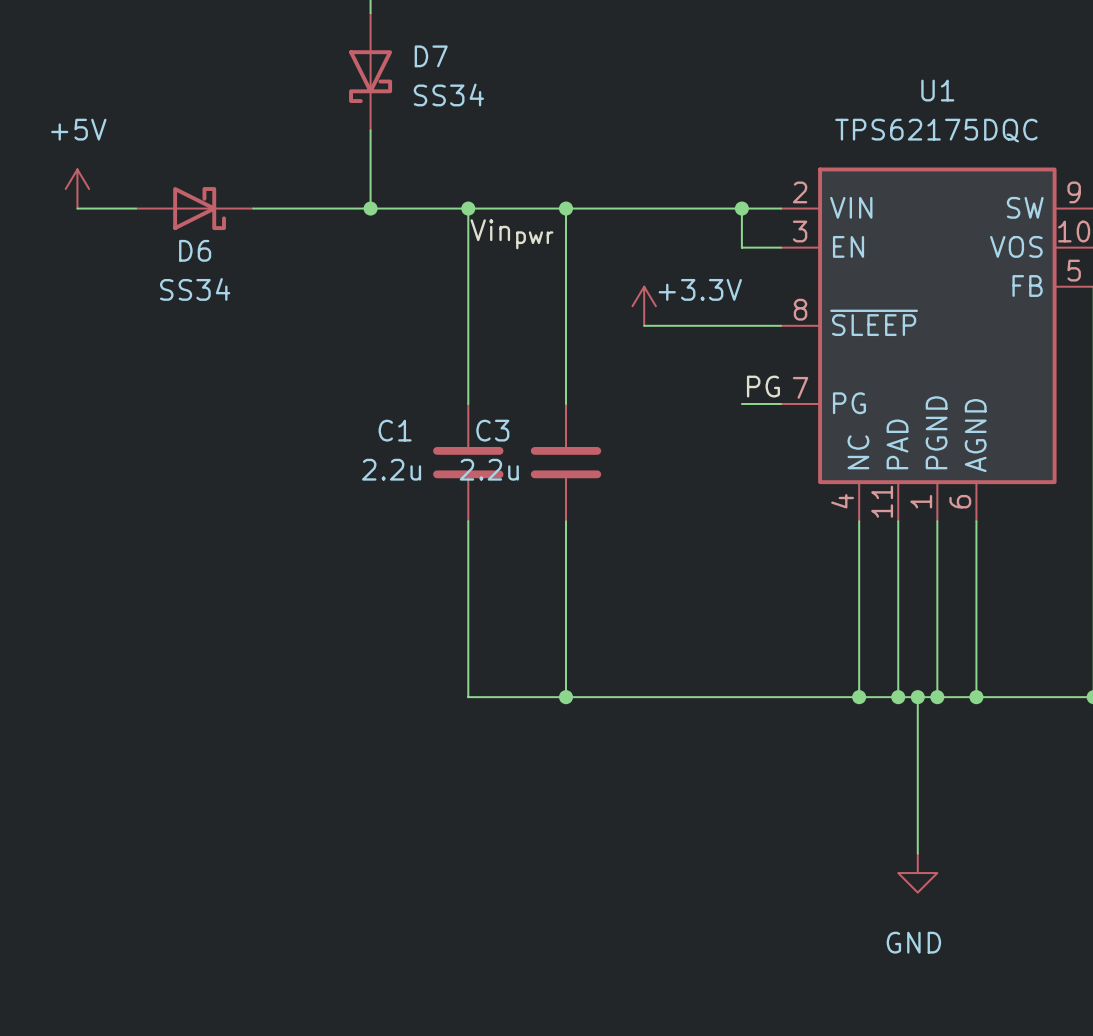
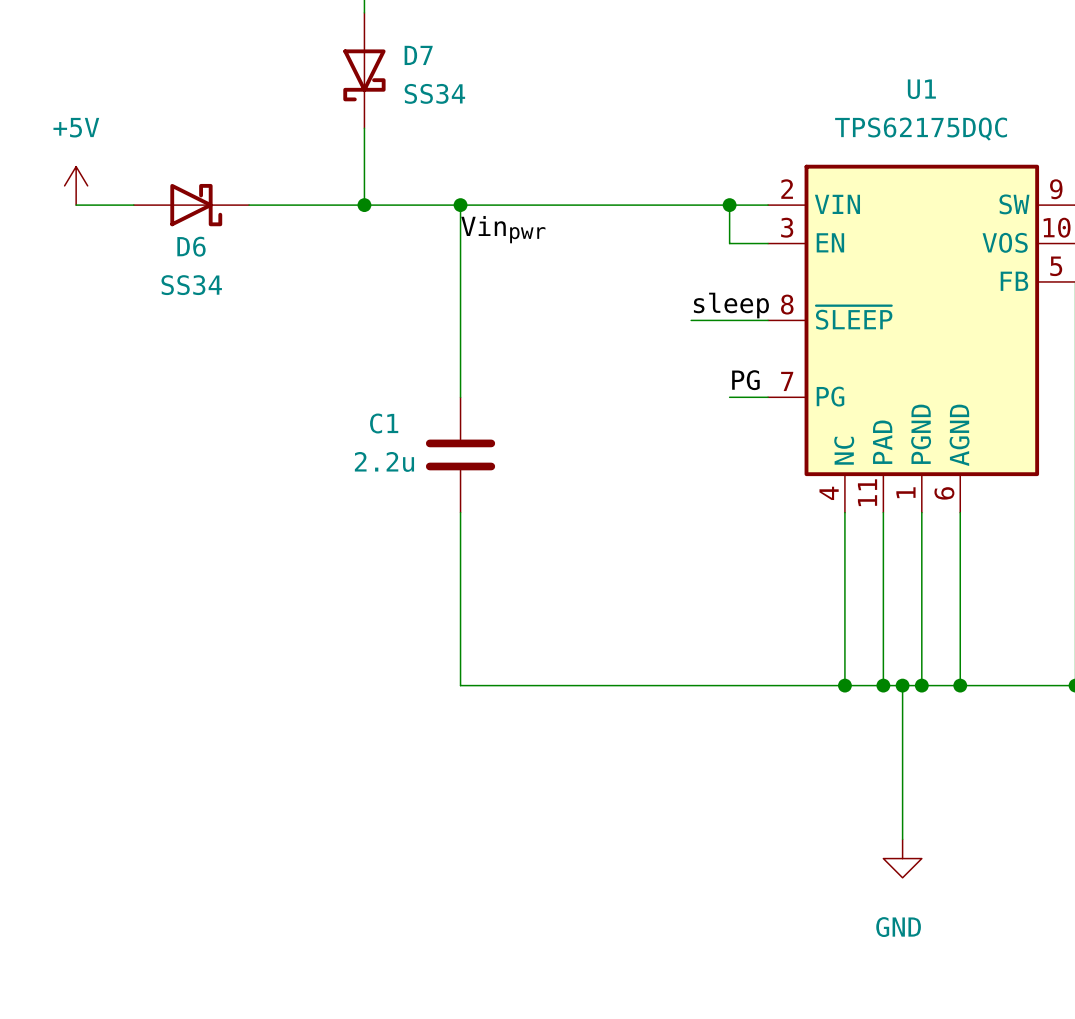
wire: (566, 208) (566, 403) -> none
junction: (566, 208) -> none
power symbol: +3.3V (644, 306) -> none
label: none -> sleep (731, 305)
wire: (644, 325) (702, 325) -> none
C3: 2.2u (566, 462) -> none
wire: (566, 521) (566, 697) -> none
junction: (566, 697) -> none

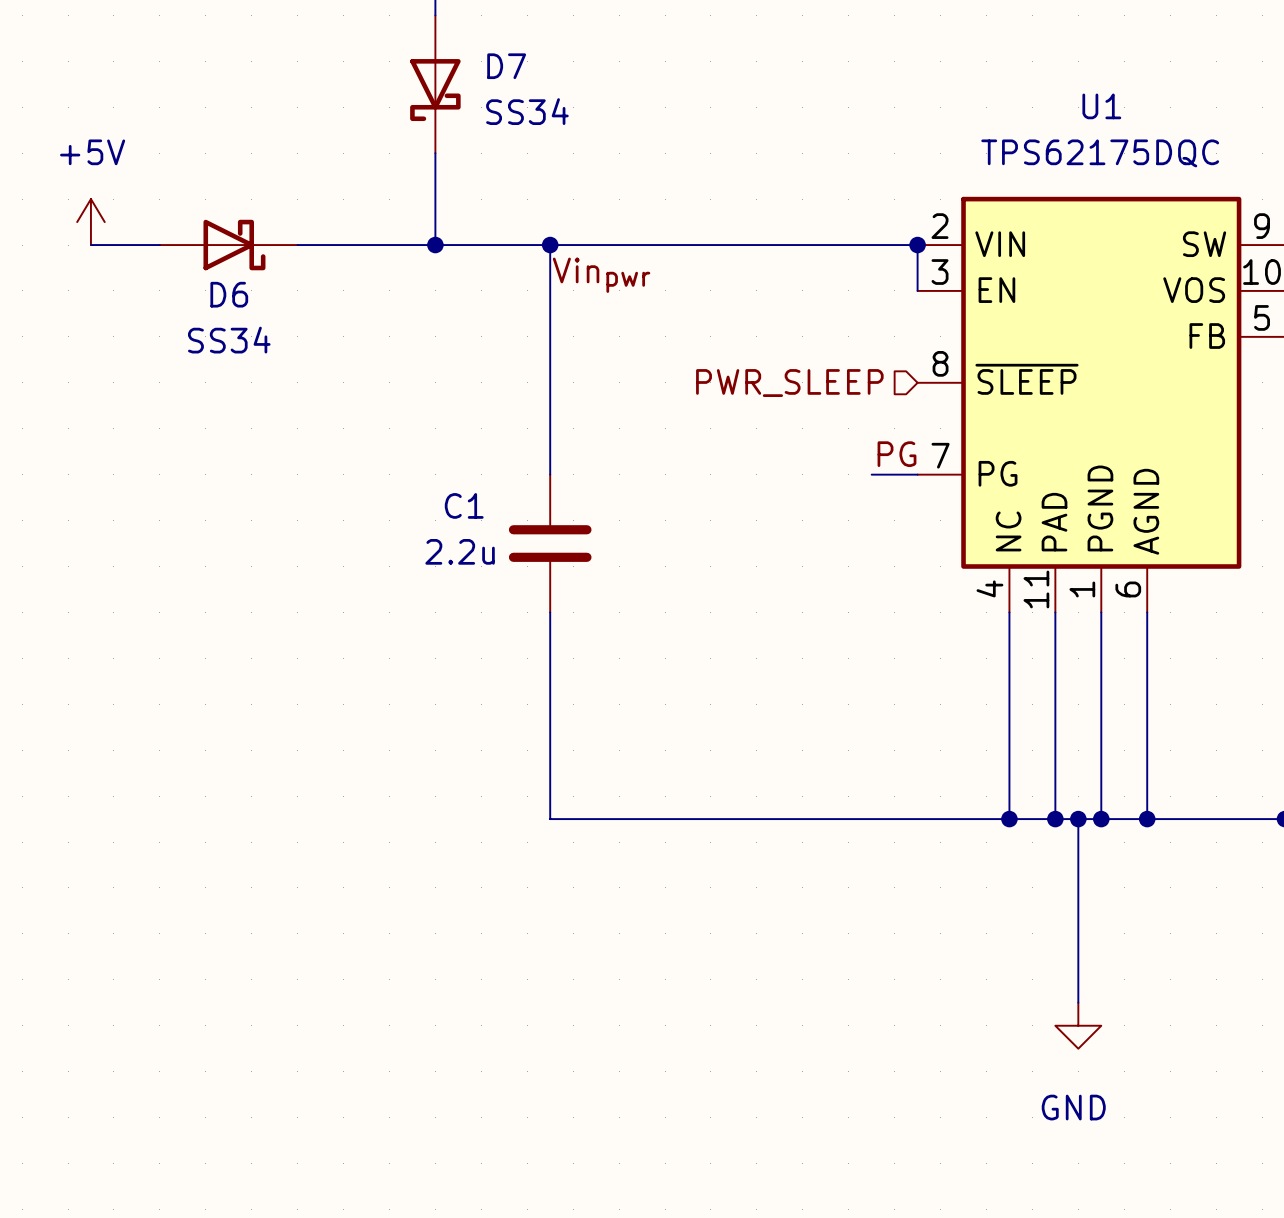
wire: (729, 205) (729, 243) (768, 243) -> (917, 245) (917, 290)
junction position: (729, 205) -> (917, 245)
label: sleep (731, 305) -> none
wire: (691, 320) (768, 320) -> none
hierarchical label: none -> PWR_SLEEP (789, 383)

